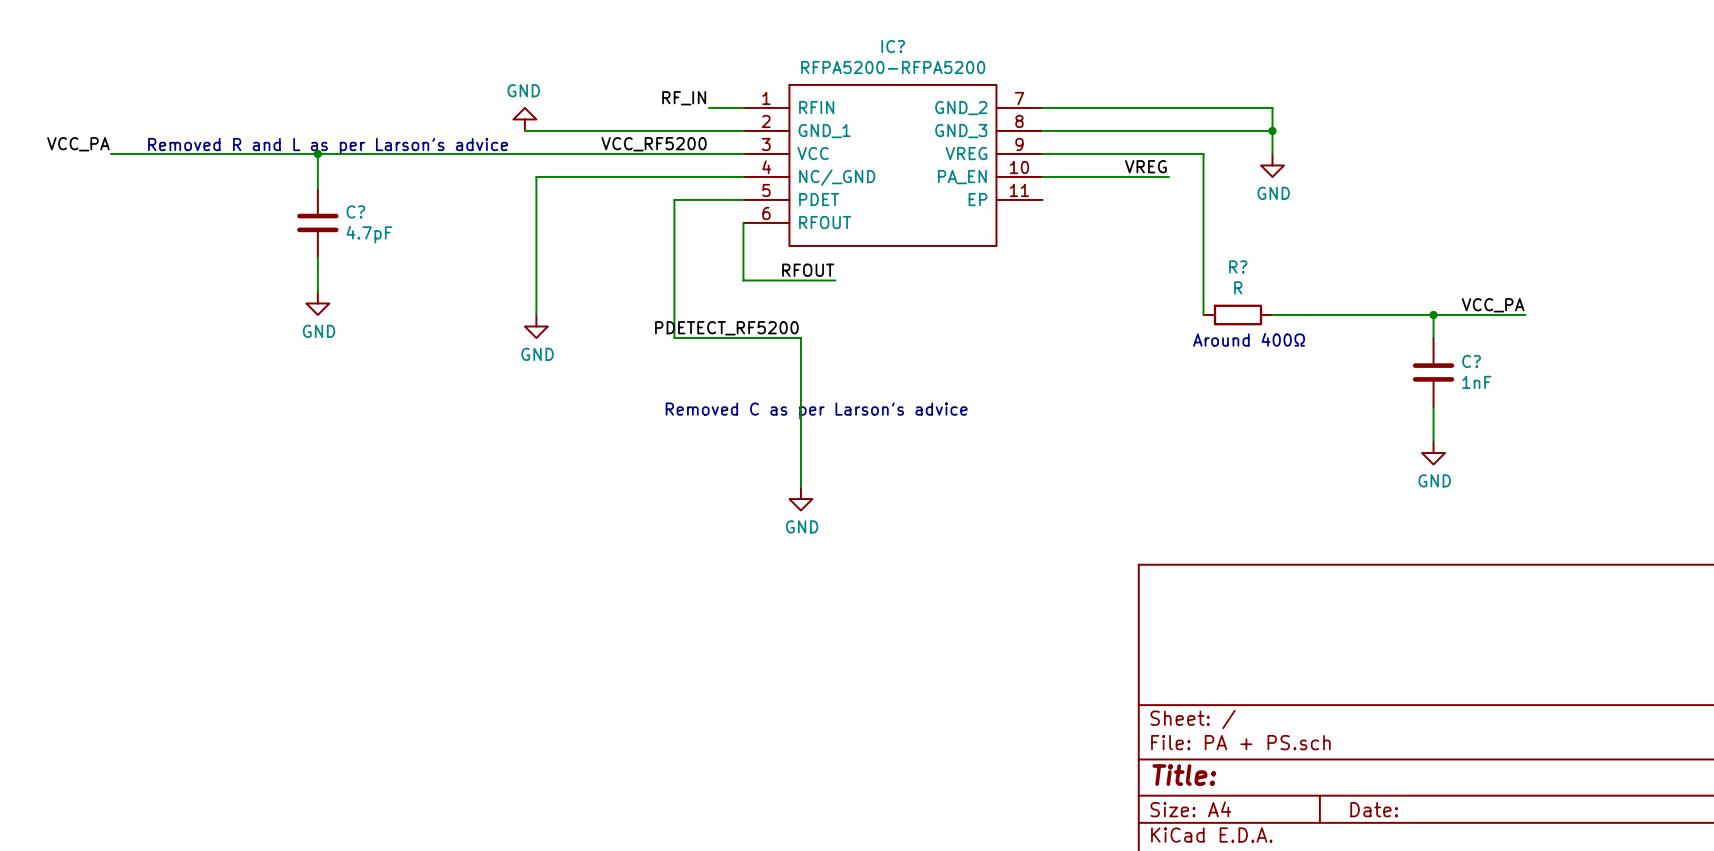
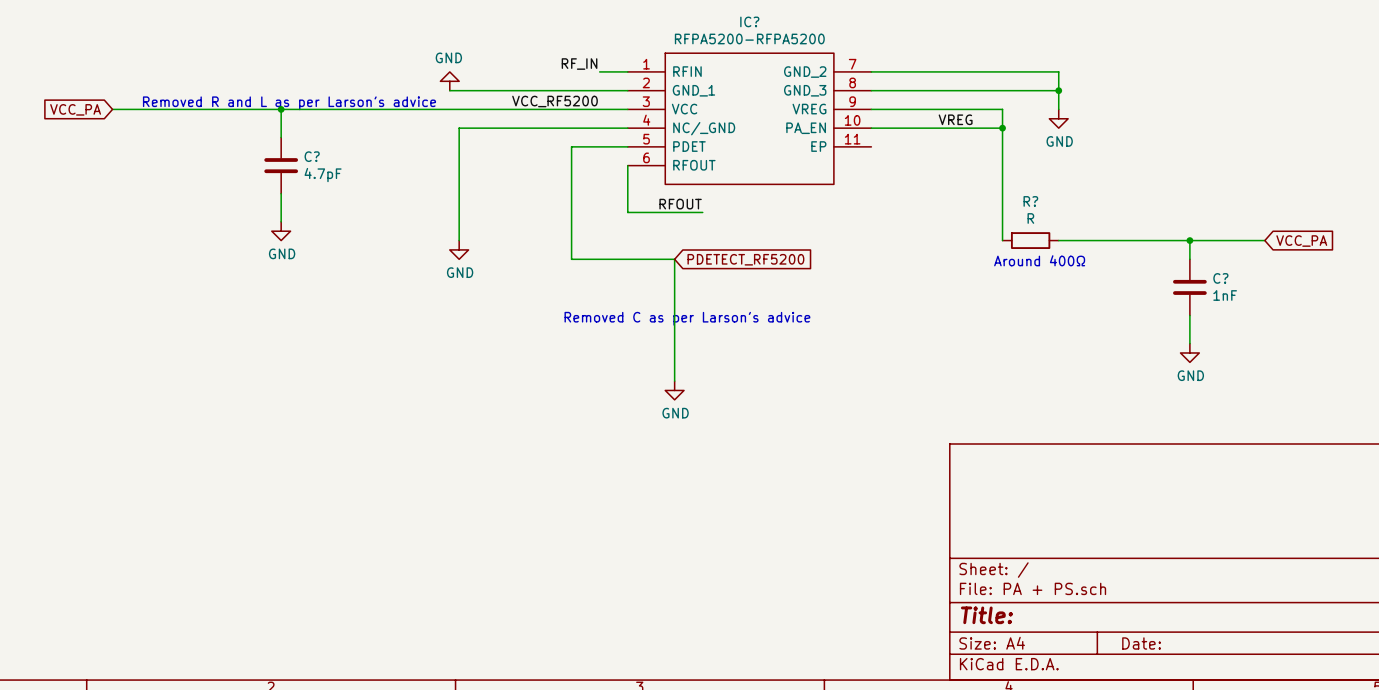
label: VCC_PA (78, 144) -> none
global label: none -> VCC_PA (75, 109)
wire: none -> (974, 128) (1002, 128)
junction: none -> (1002, 128)
label: VCC_PA (1493, 305) -> none
global label: none -> VCC_PA (1301, 241)
label: PDETECT_RF5200 (726, 328) -> none
global label: none -> PDETECT_RF5200 (745, 259)

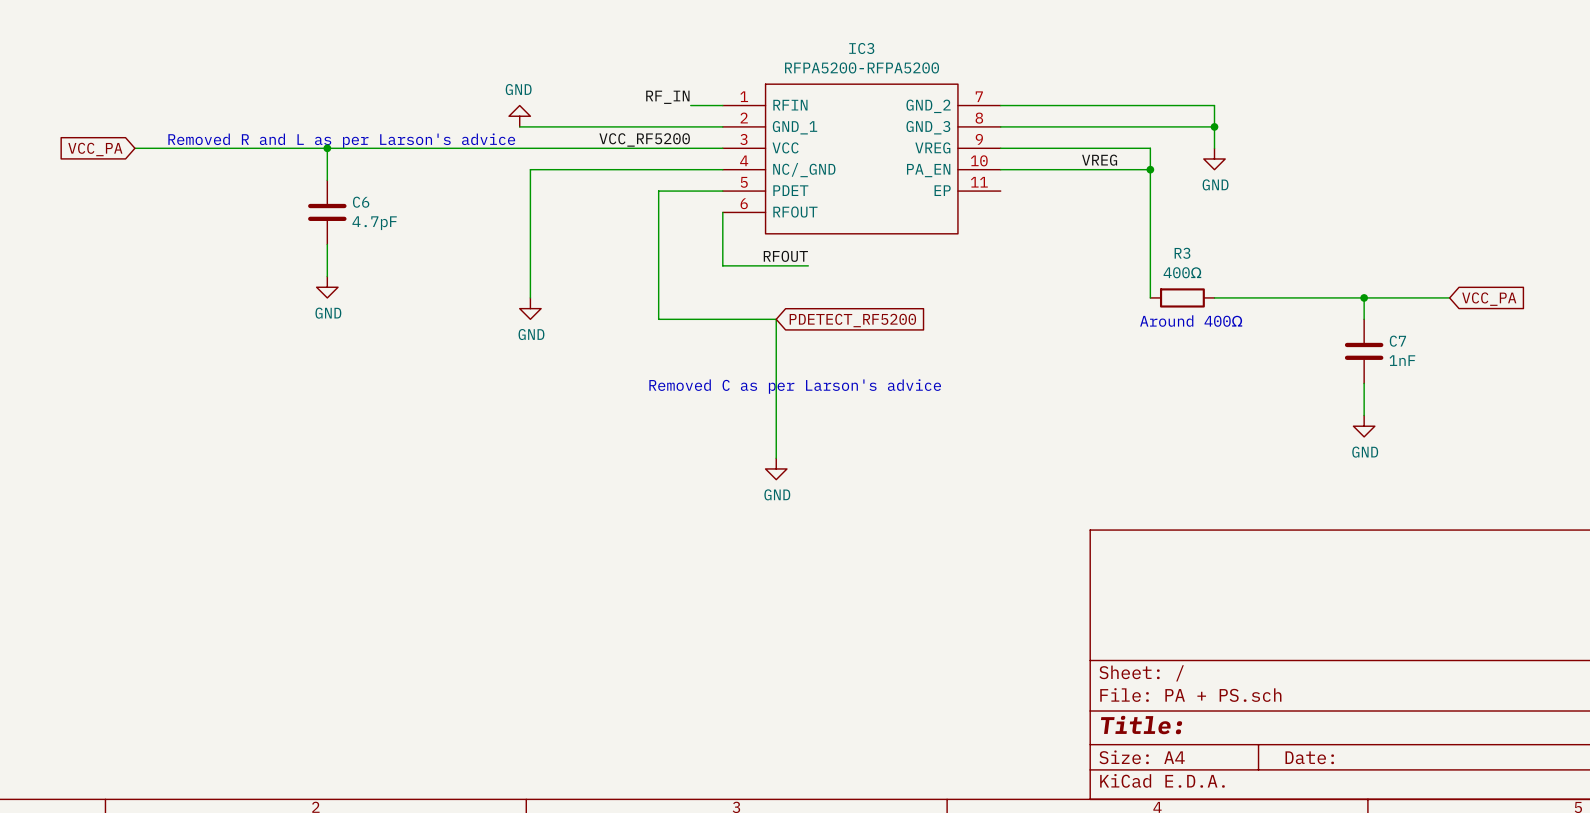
IC? name: IC? (749, 21) -> IC3 (861, 48)
C? name: C? (312, 156) -> C6 (361, 202)
R? name: R? (1030, 201) -> R3 (1182, 253)
R? value: R (1030, 218) -> 400Ω (1182, 272)
C? name: C? (1220, 278) -> C7 (1397, 341)

